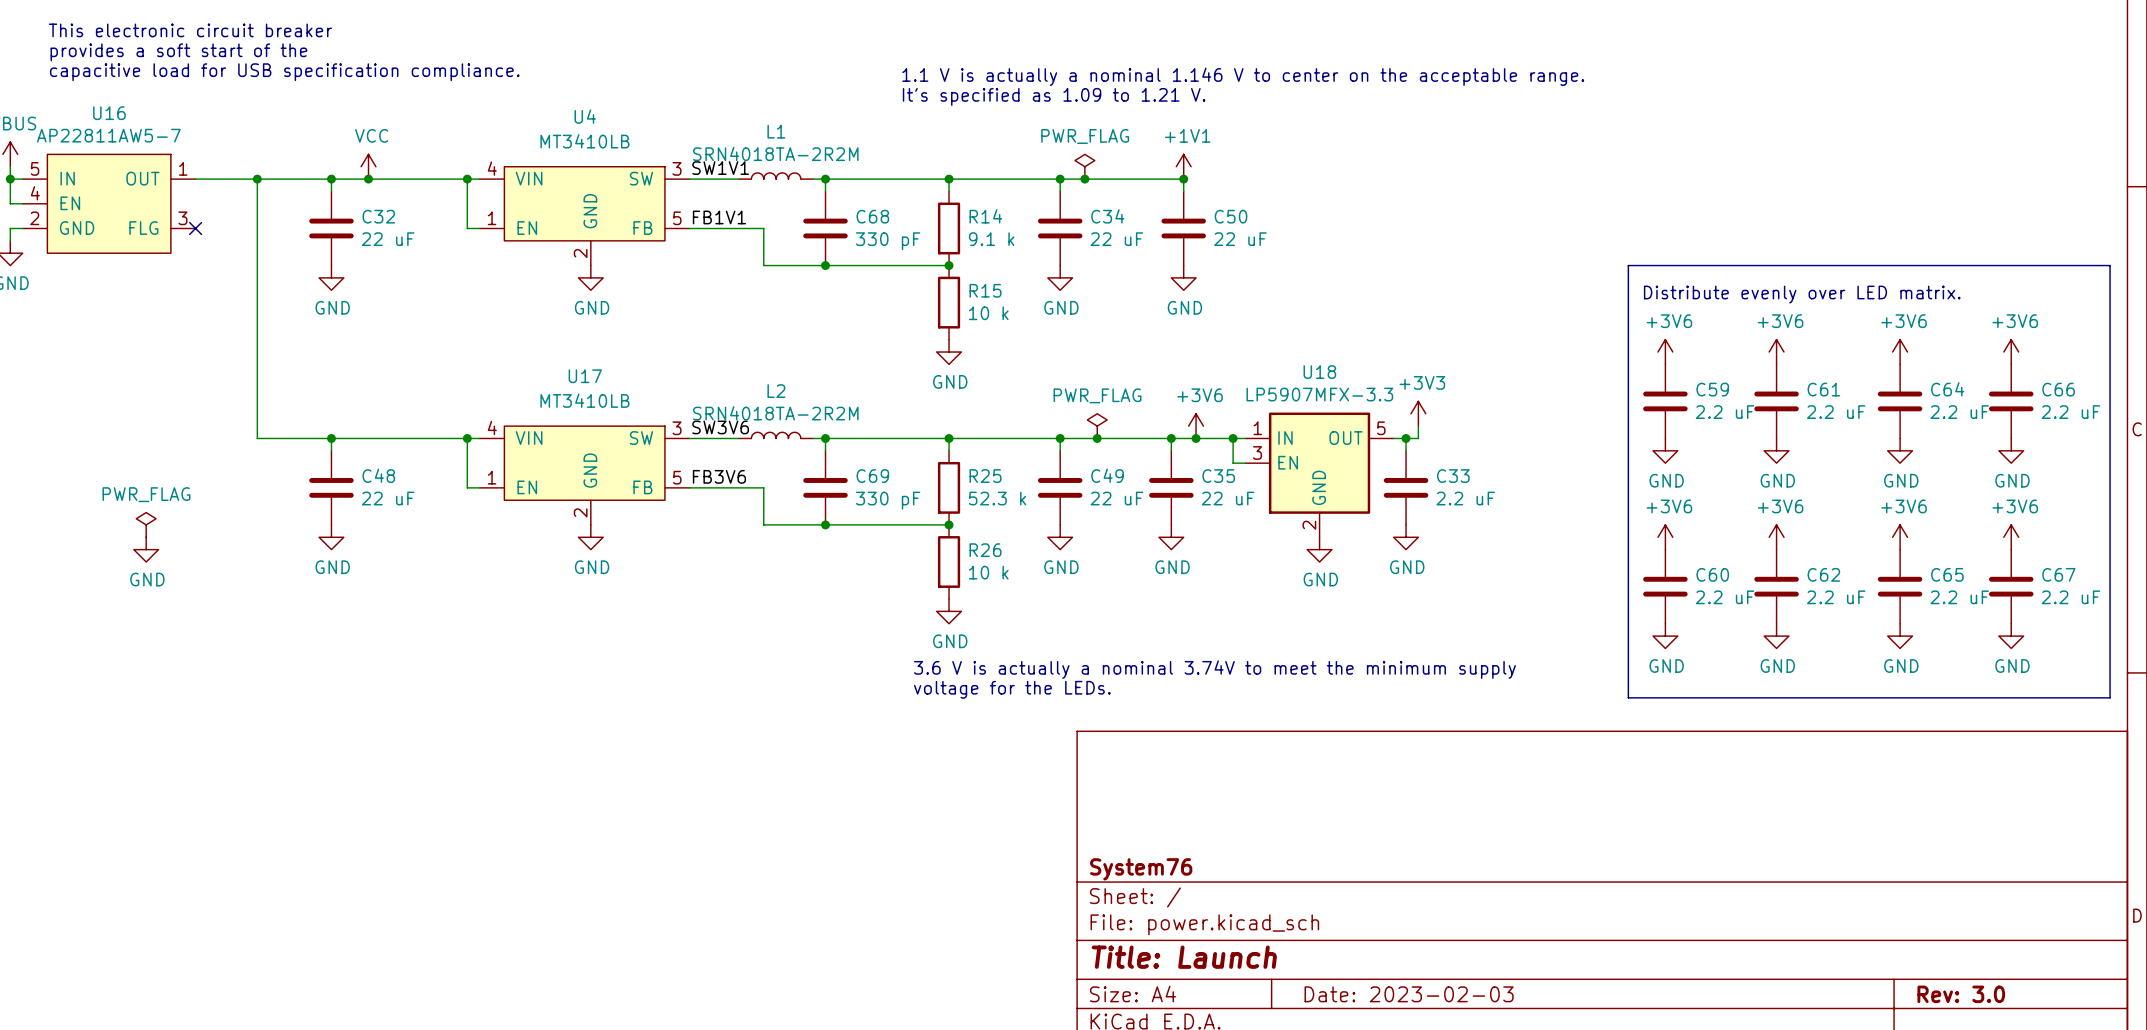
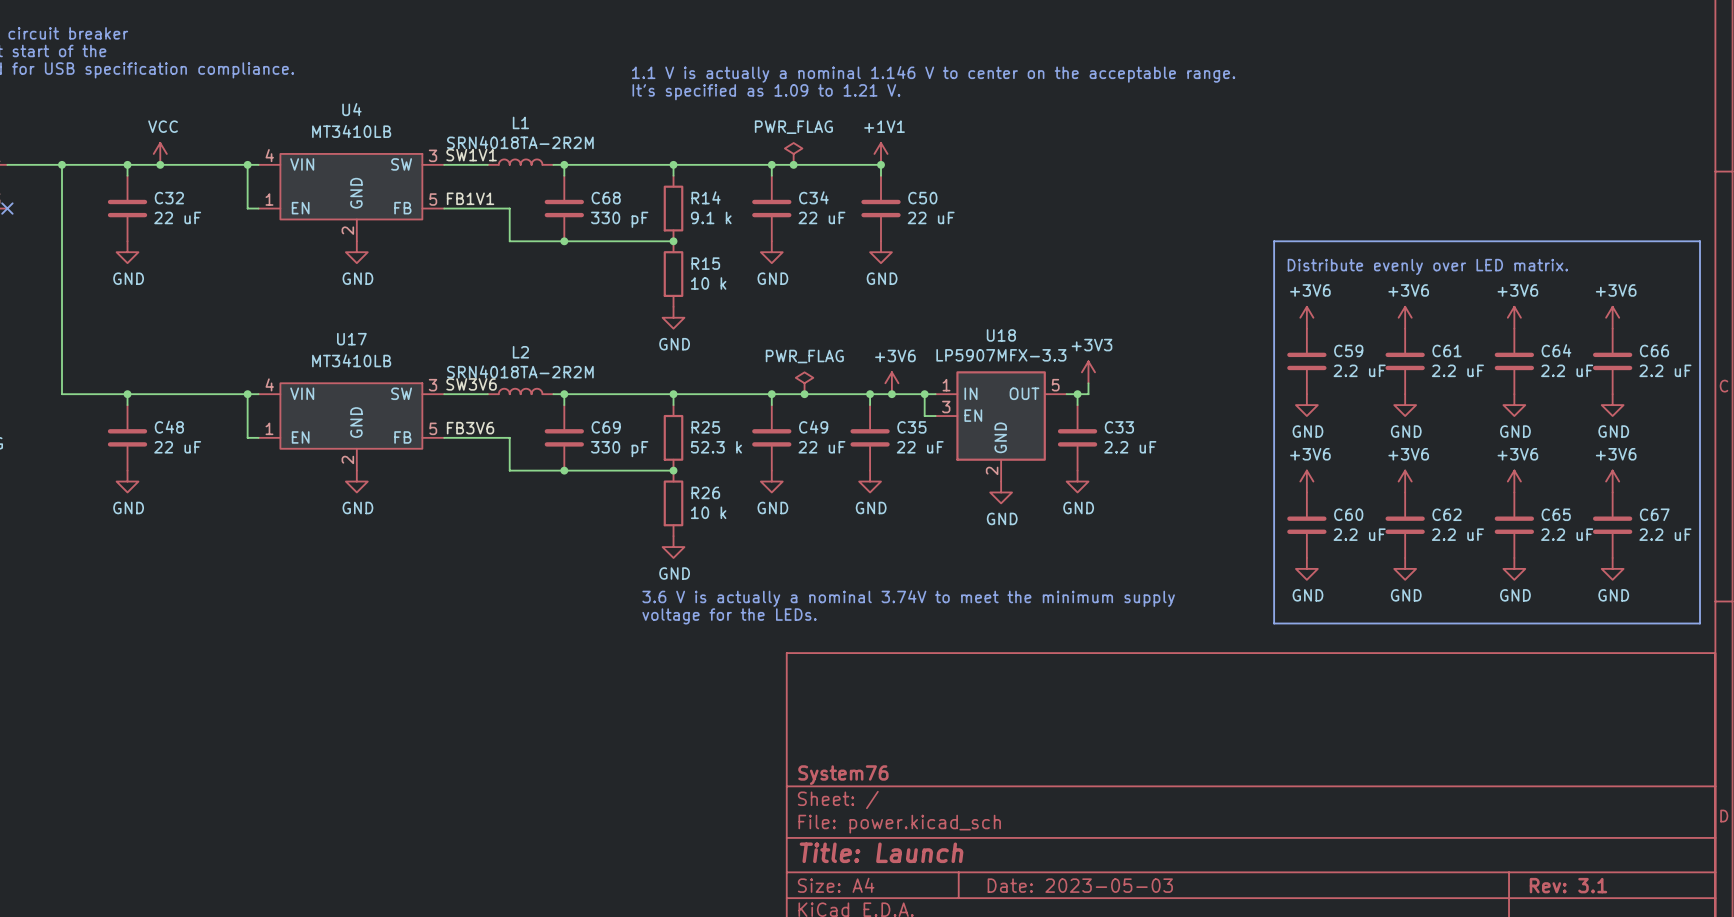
title block: Date: 2023-02-03 (1409, 994) -> Date: 2023-05-03 (1080, 885)
title block: Rev: 3.0 (1961, 994) -> Rev: 3.1 (1568, 885)

